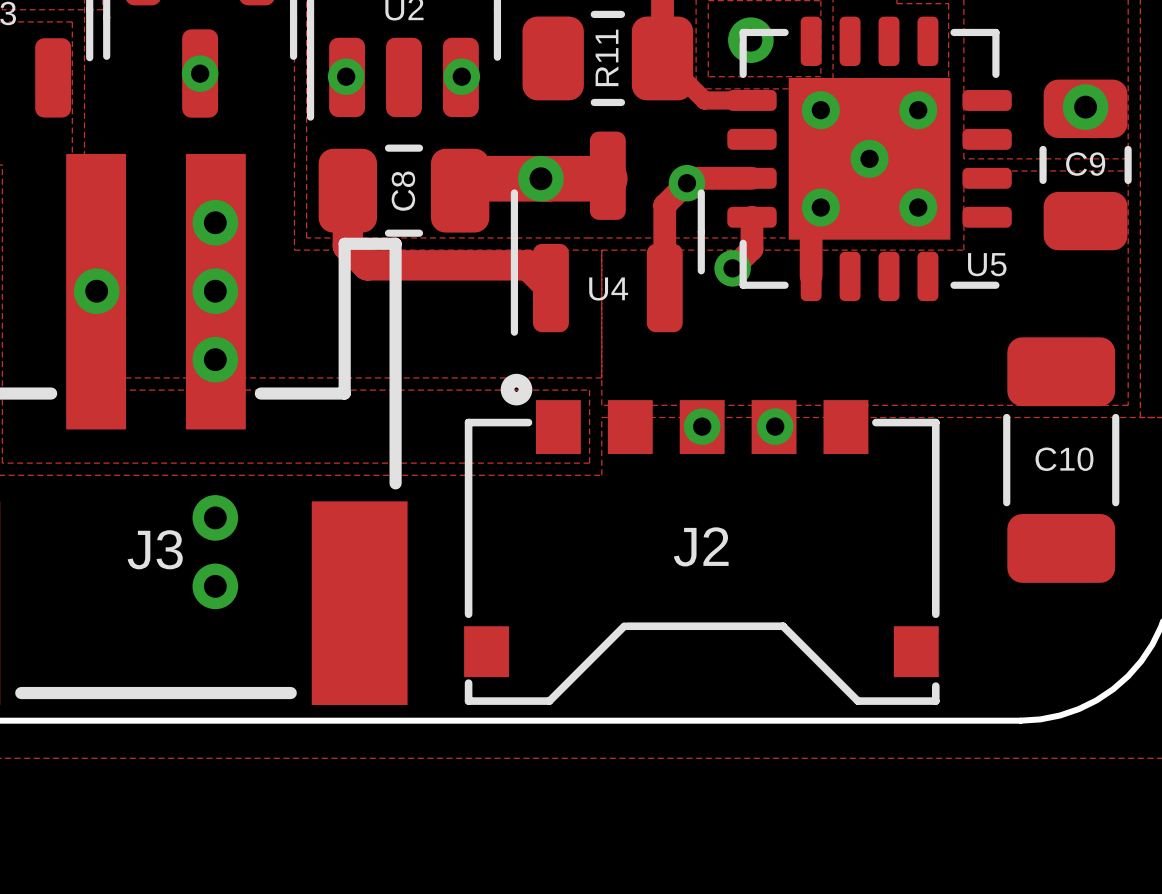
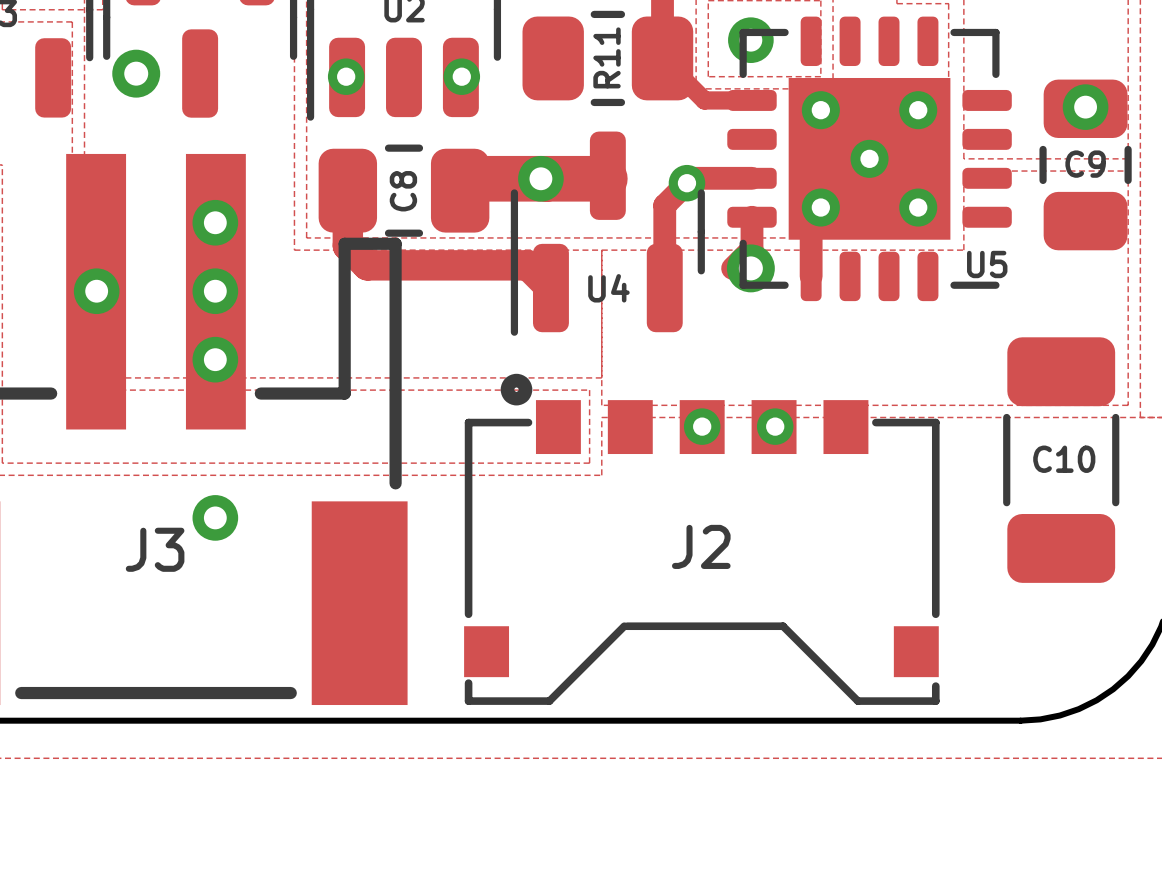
via: none -> (136, 73)
via: (200, 73) -> none
via size: [714, 250, 751, 287] -> [726, 244, 775, 293]
via: (215, 586) -> none

